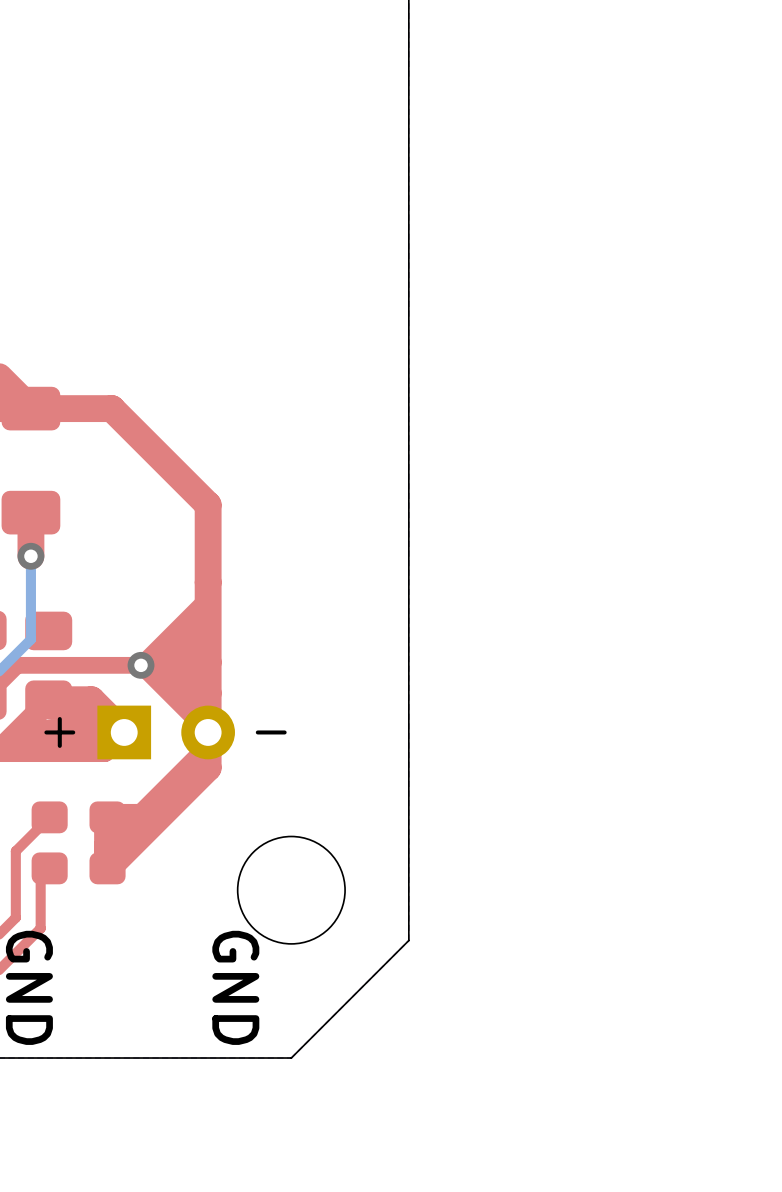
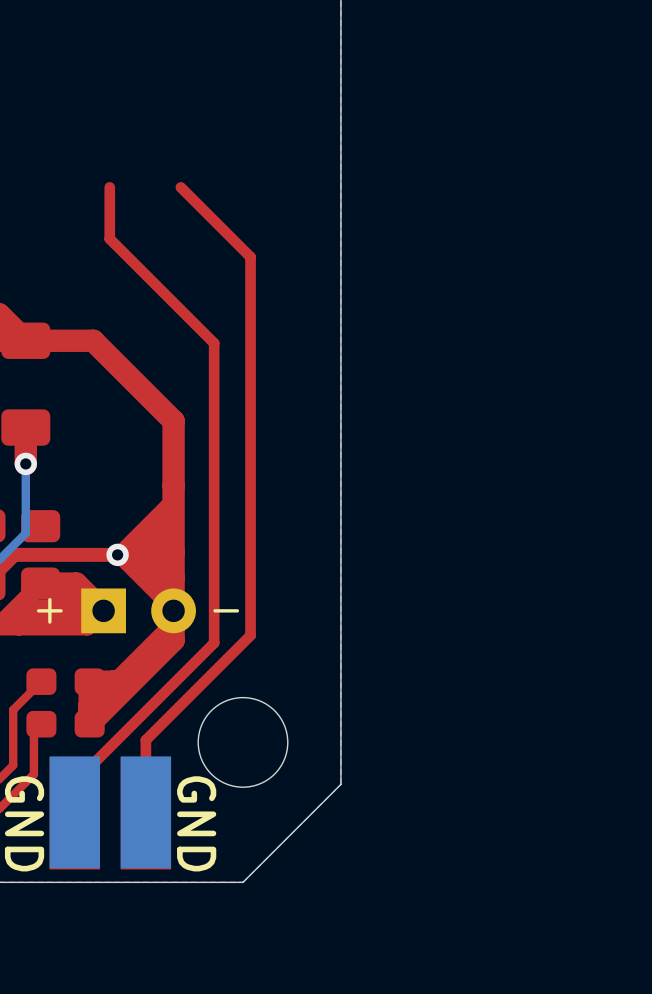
top track: none -> (109, 187) (109, 238) (214, 343) (214, 643) (74, 782) (74, 813)
top track: none -> (180, 187) (250, 257) (250, 635) (145, 740) (145, 813)
part: none -> (110, 812)

